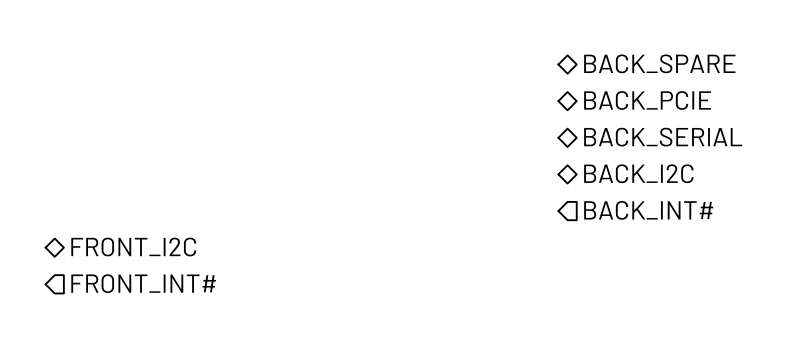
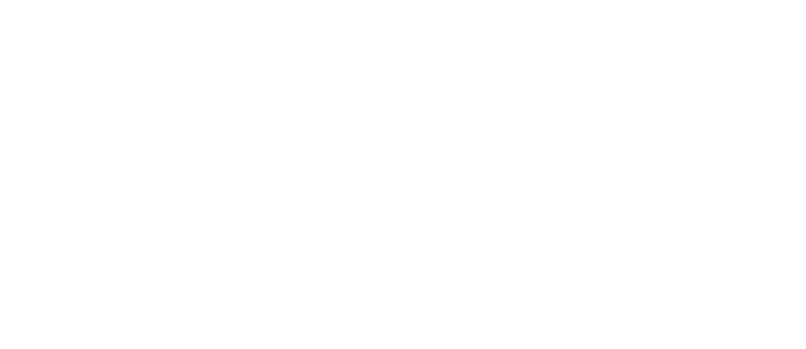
hierarchical label: BACK_SPARE (659, 63) -> none
hierarchical label: BACK_PCIE (647, 100) -> none
hierarchical label: BACK_SERIAL (663, 137) -> none
hierarchical label: BACK_I2C (638, 173) -> none
hierarchical label: BACK_INT# (648, 210) -> none
hierarchical label: FRONT_I2C (133, 247) -> none
hierarchical label: FRONT_INT# (143, 283) -> none

